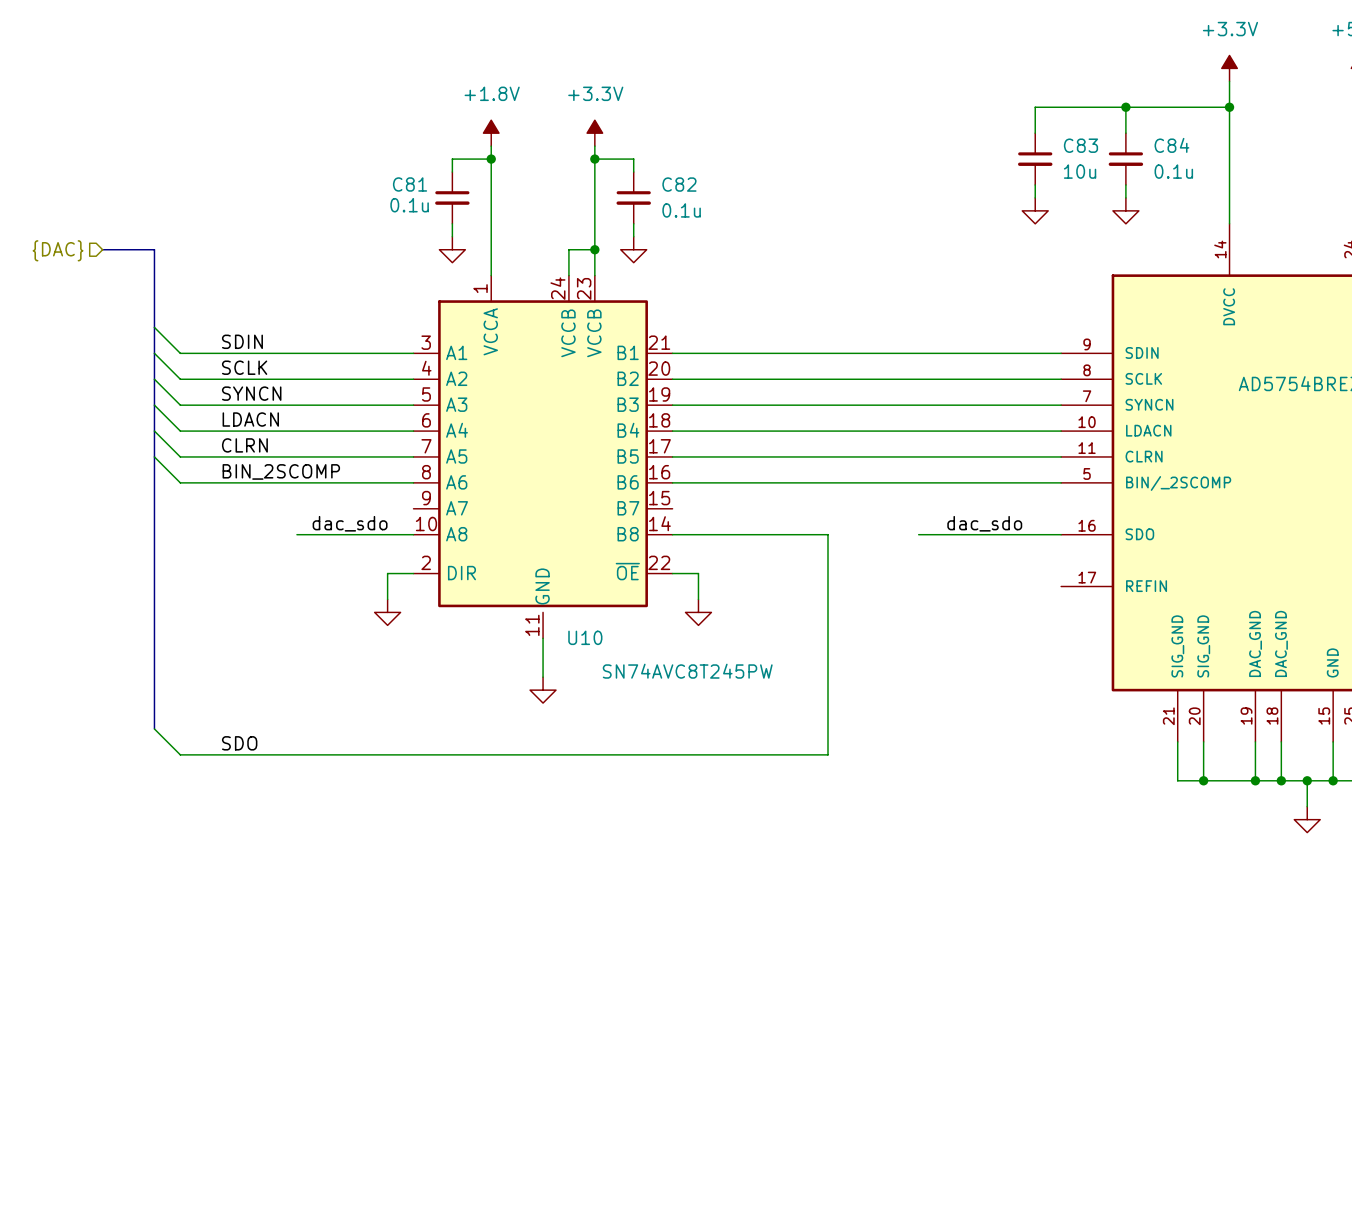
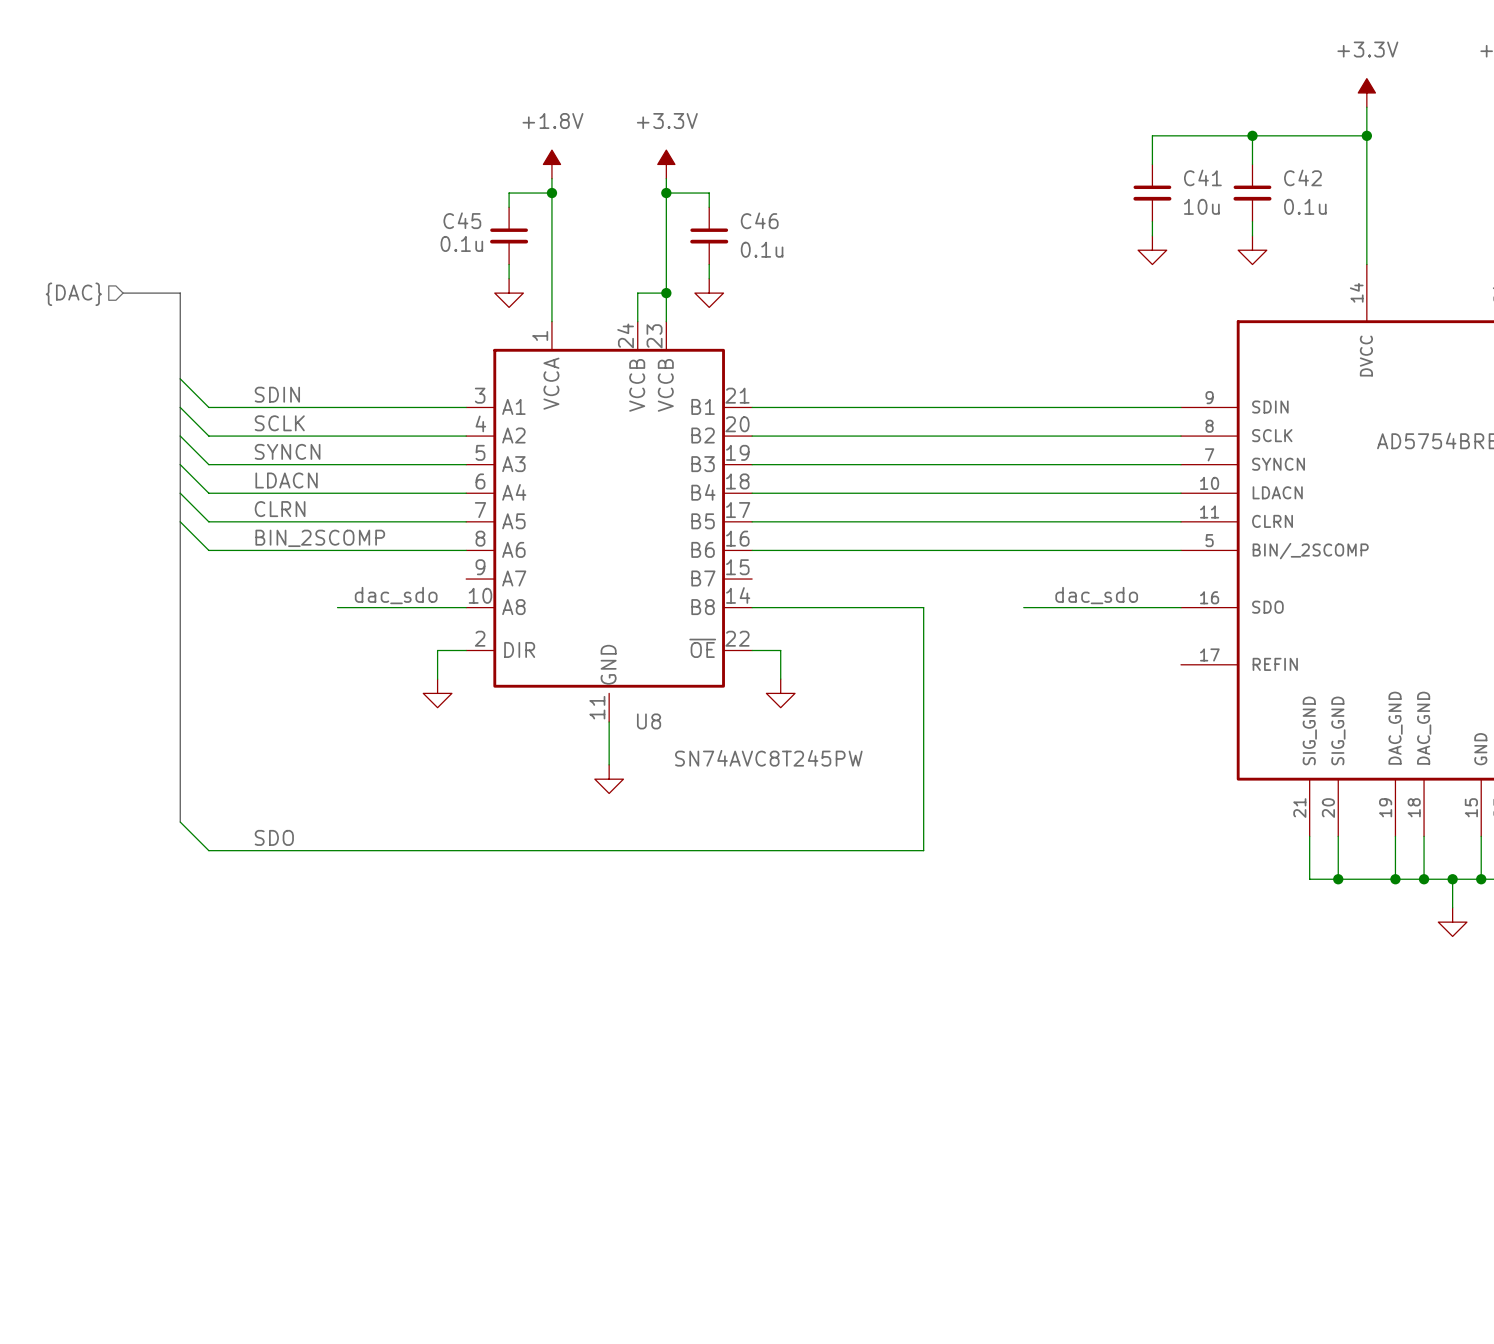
C83 name: C83 (1080, 145) -> C41 (1202, 177)
C84 name: C84 (1171, 145) -> C42 (1302, 177)
C81 name: C81 (410, 184) -> C45 (462, 220)
C82 name: C82 (679, 184) -> C46 (759, 220)
U10 name: U10 (585, 637) -> U8 (649, 721)

